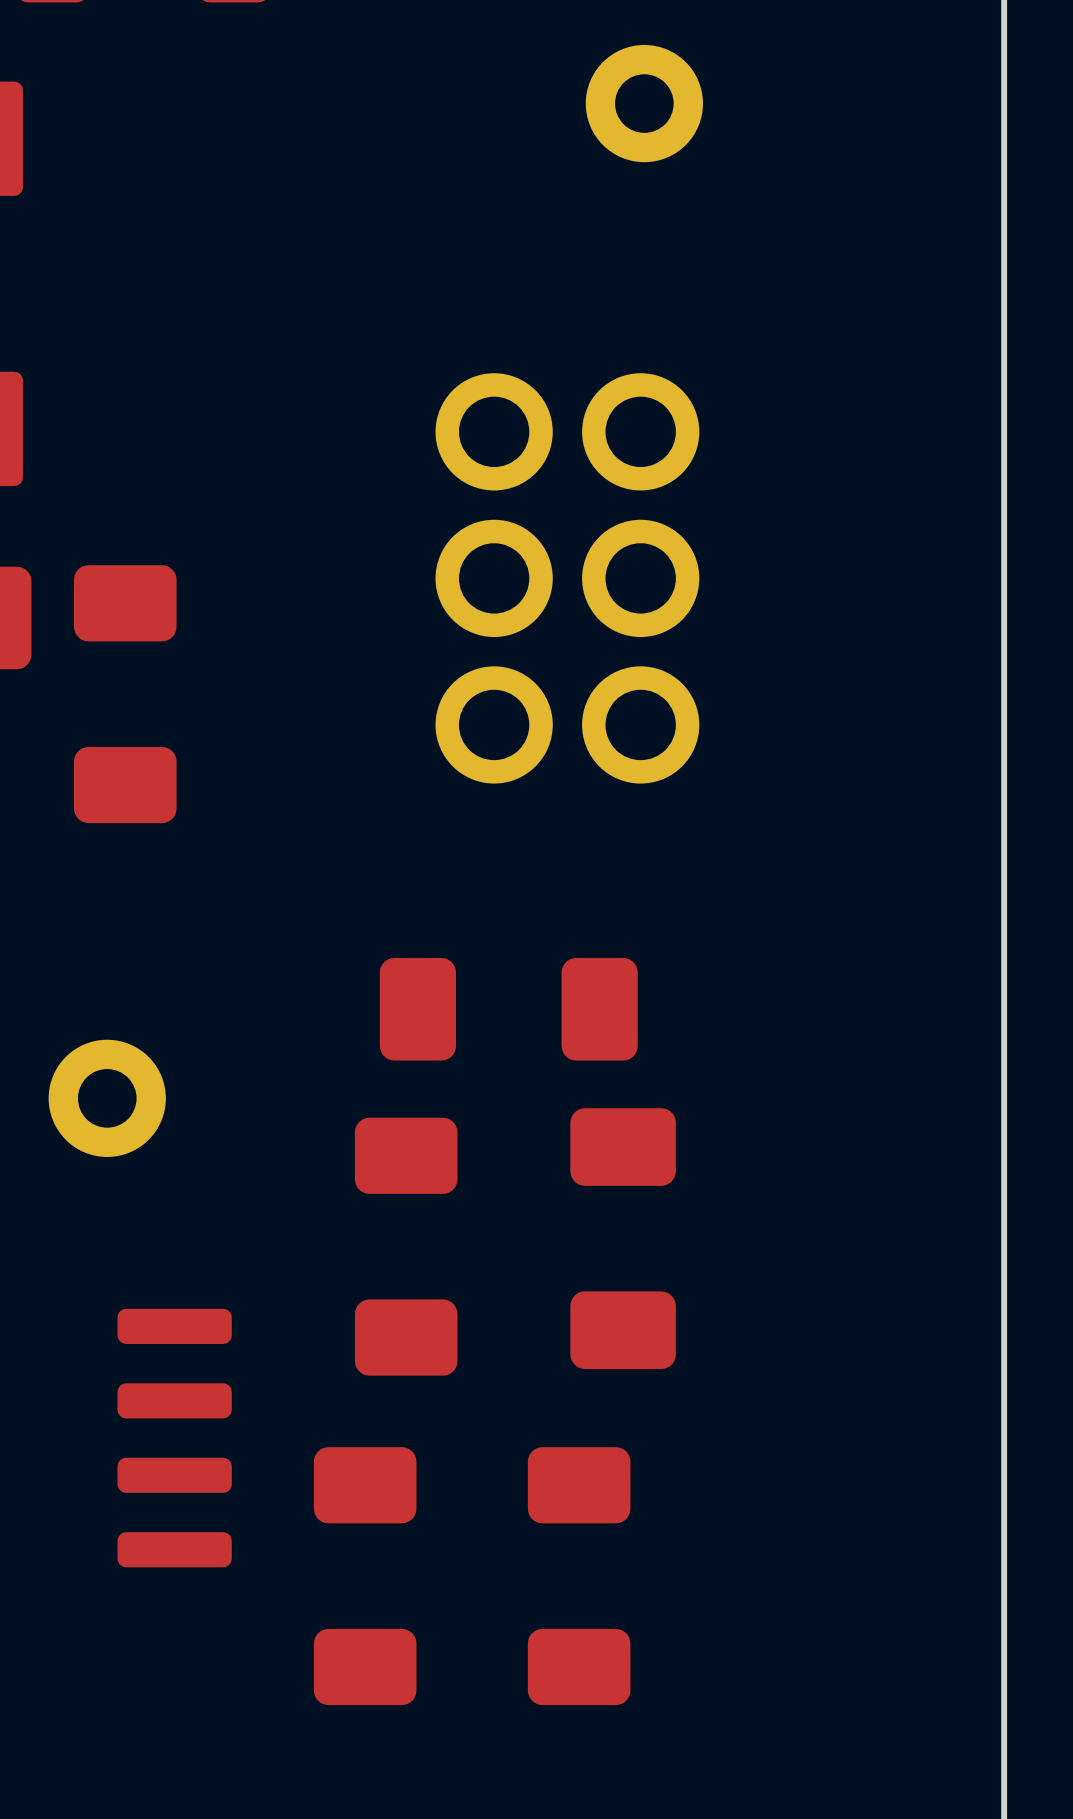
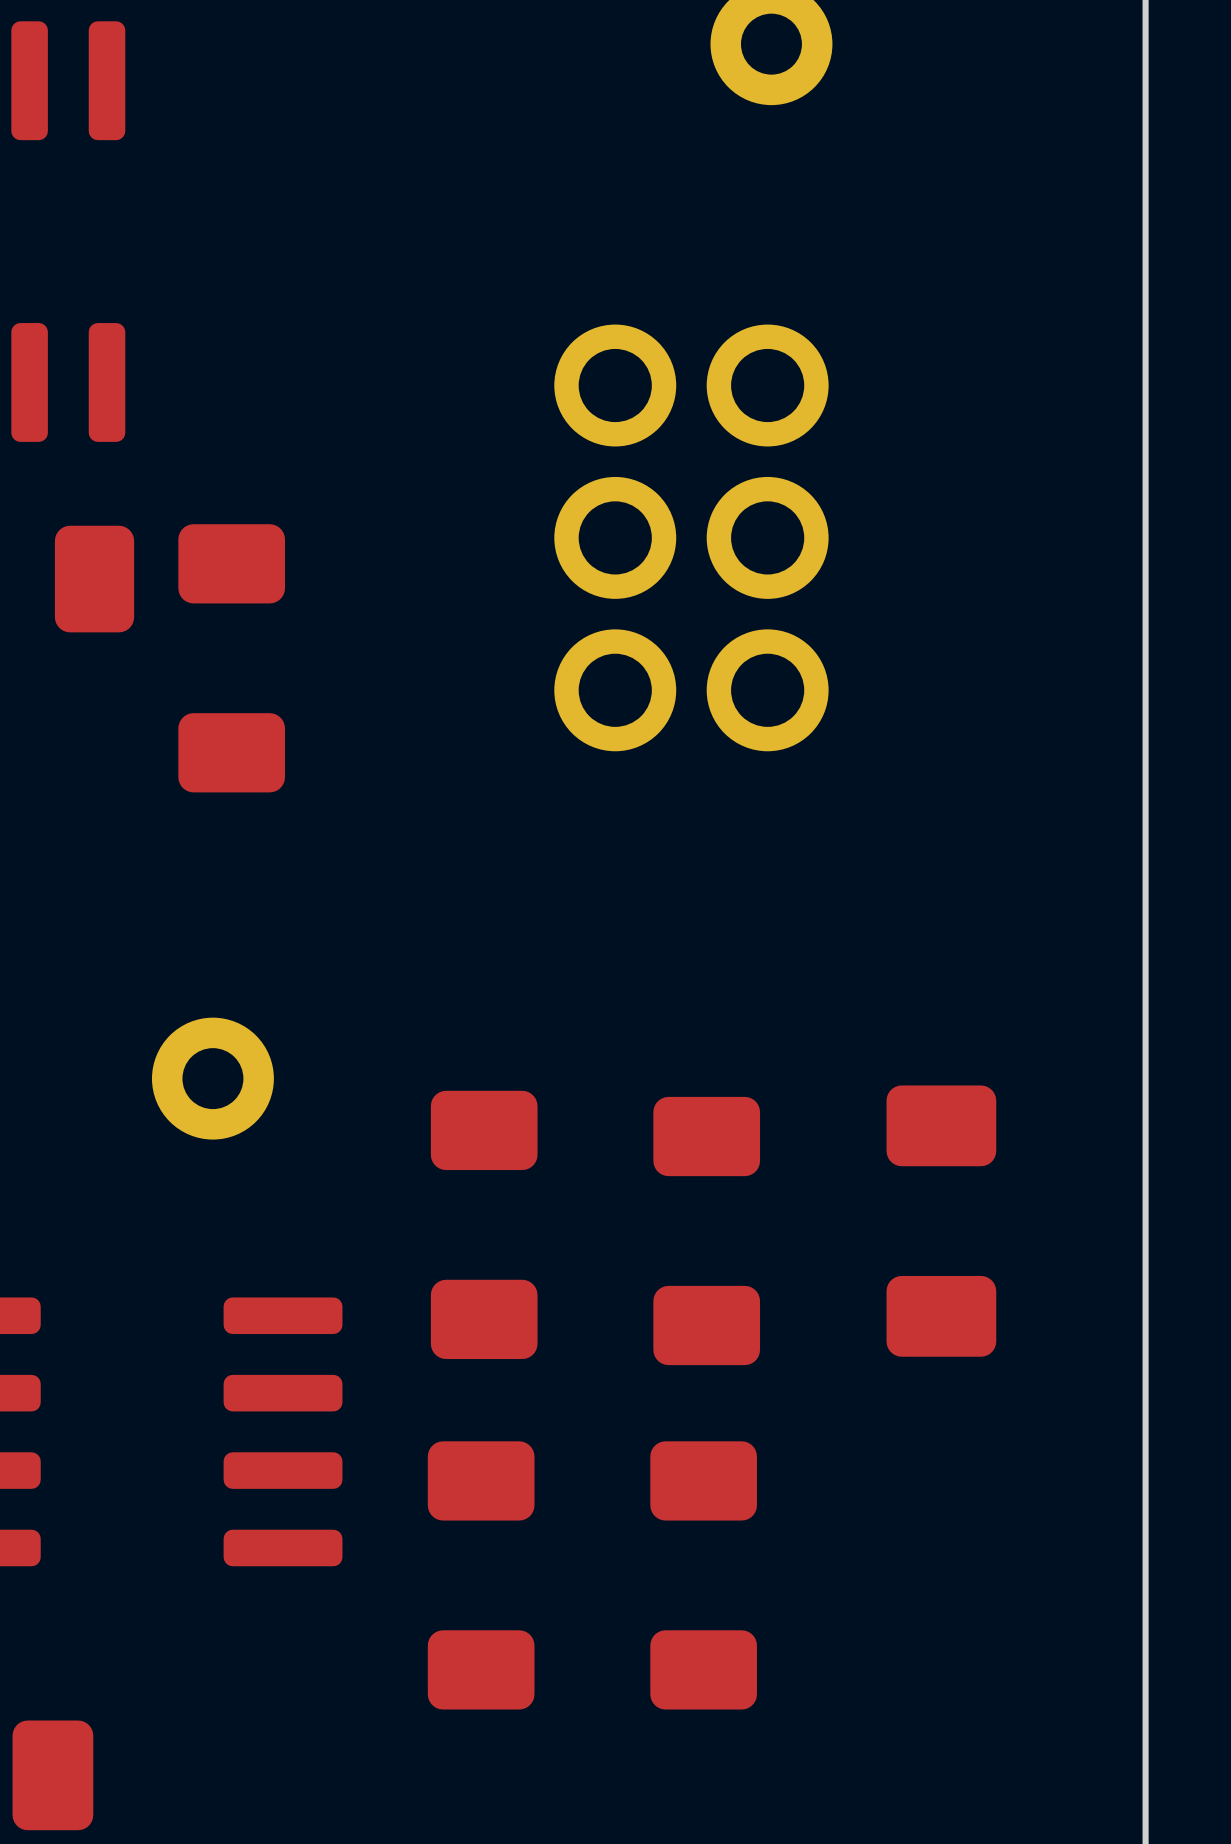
part: (508, 1009) -> none
part footprint: [570, 1108, 676, 1370] -> [653, 1096, 761, 1366]
part: none -> (941, 1221)
part position: (406, 1246) -> (484, 1224)

